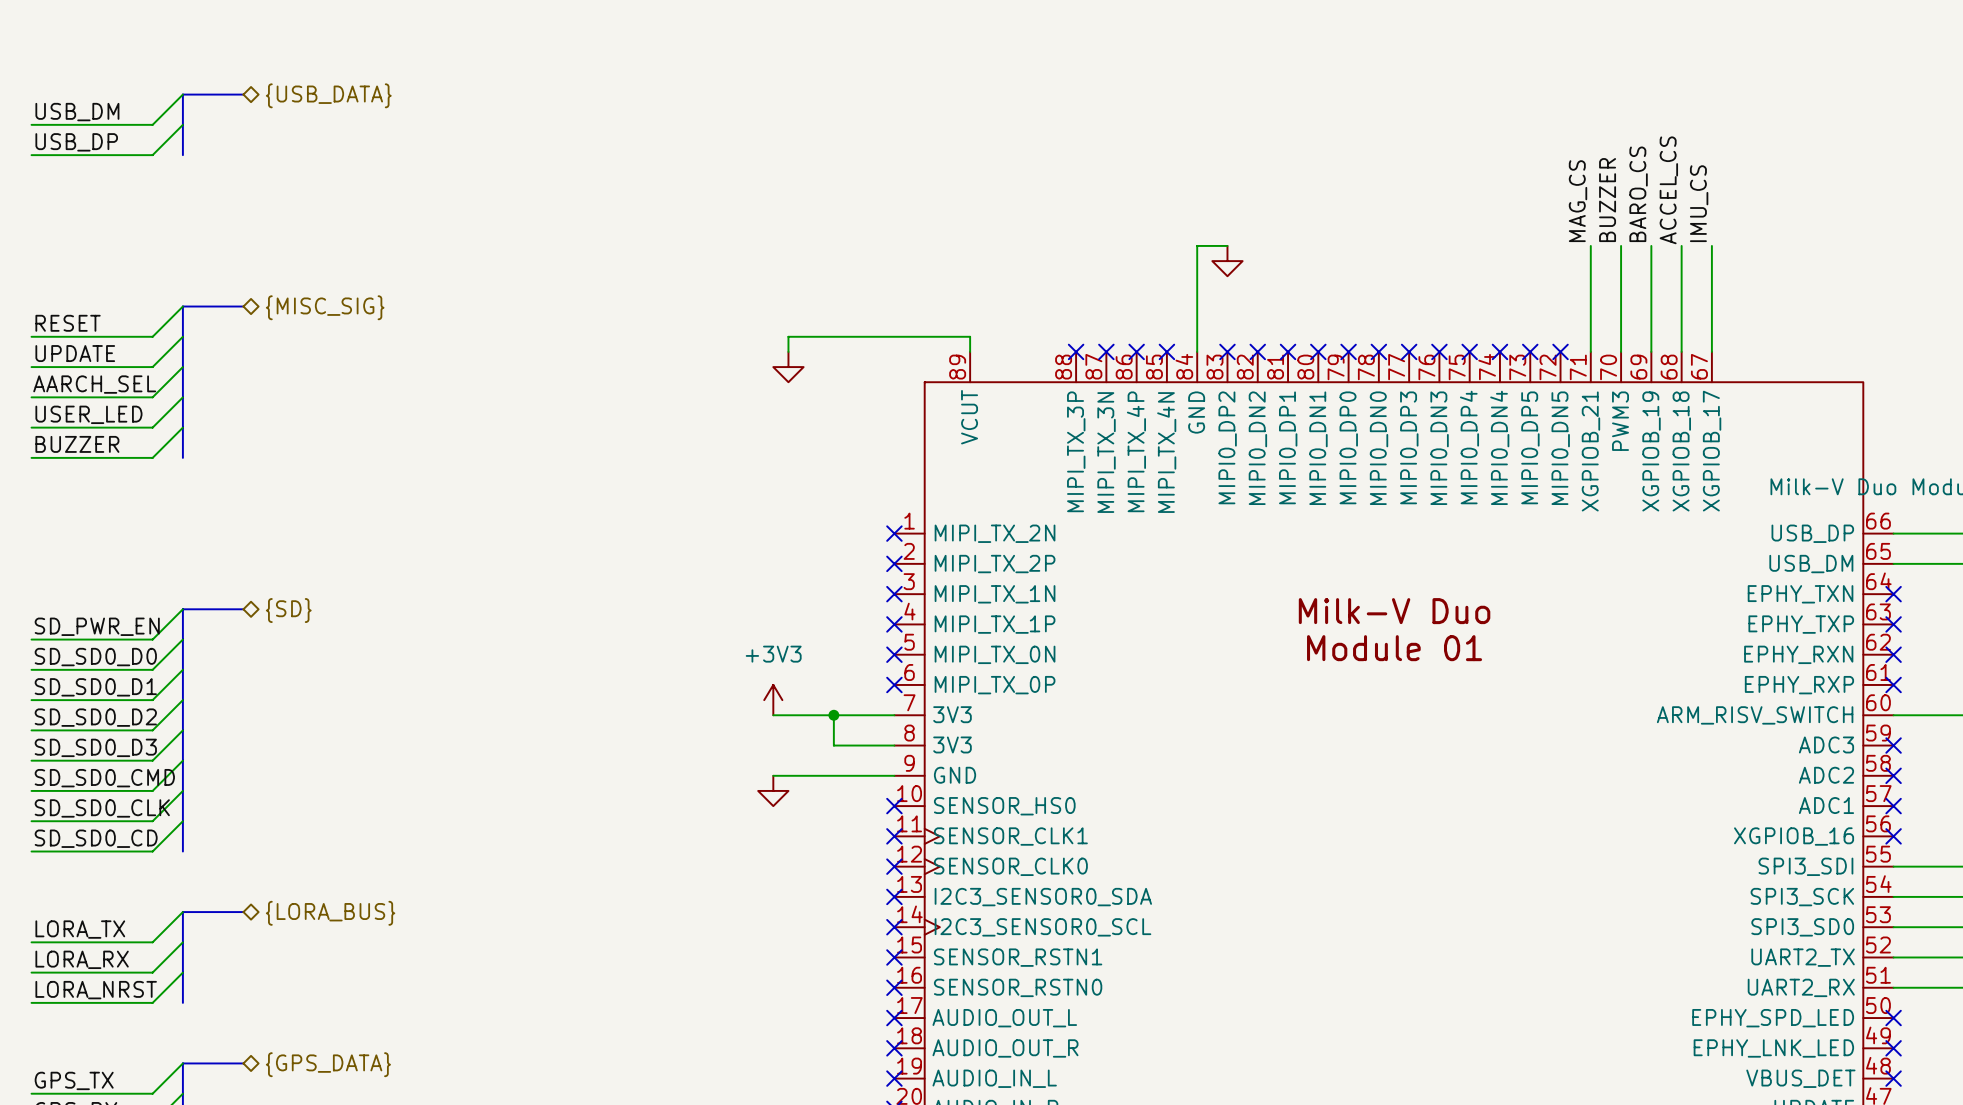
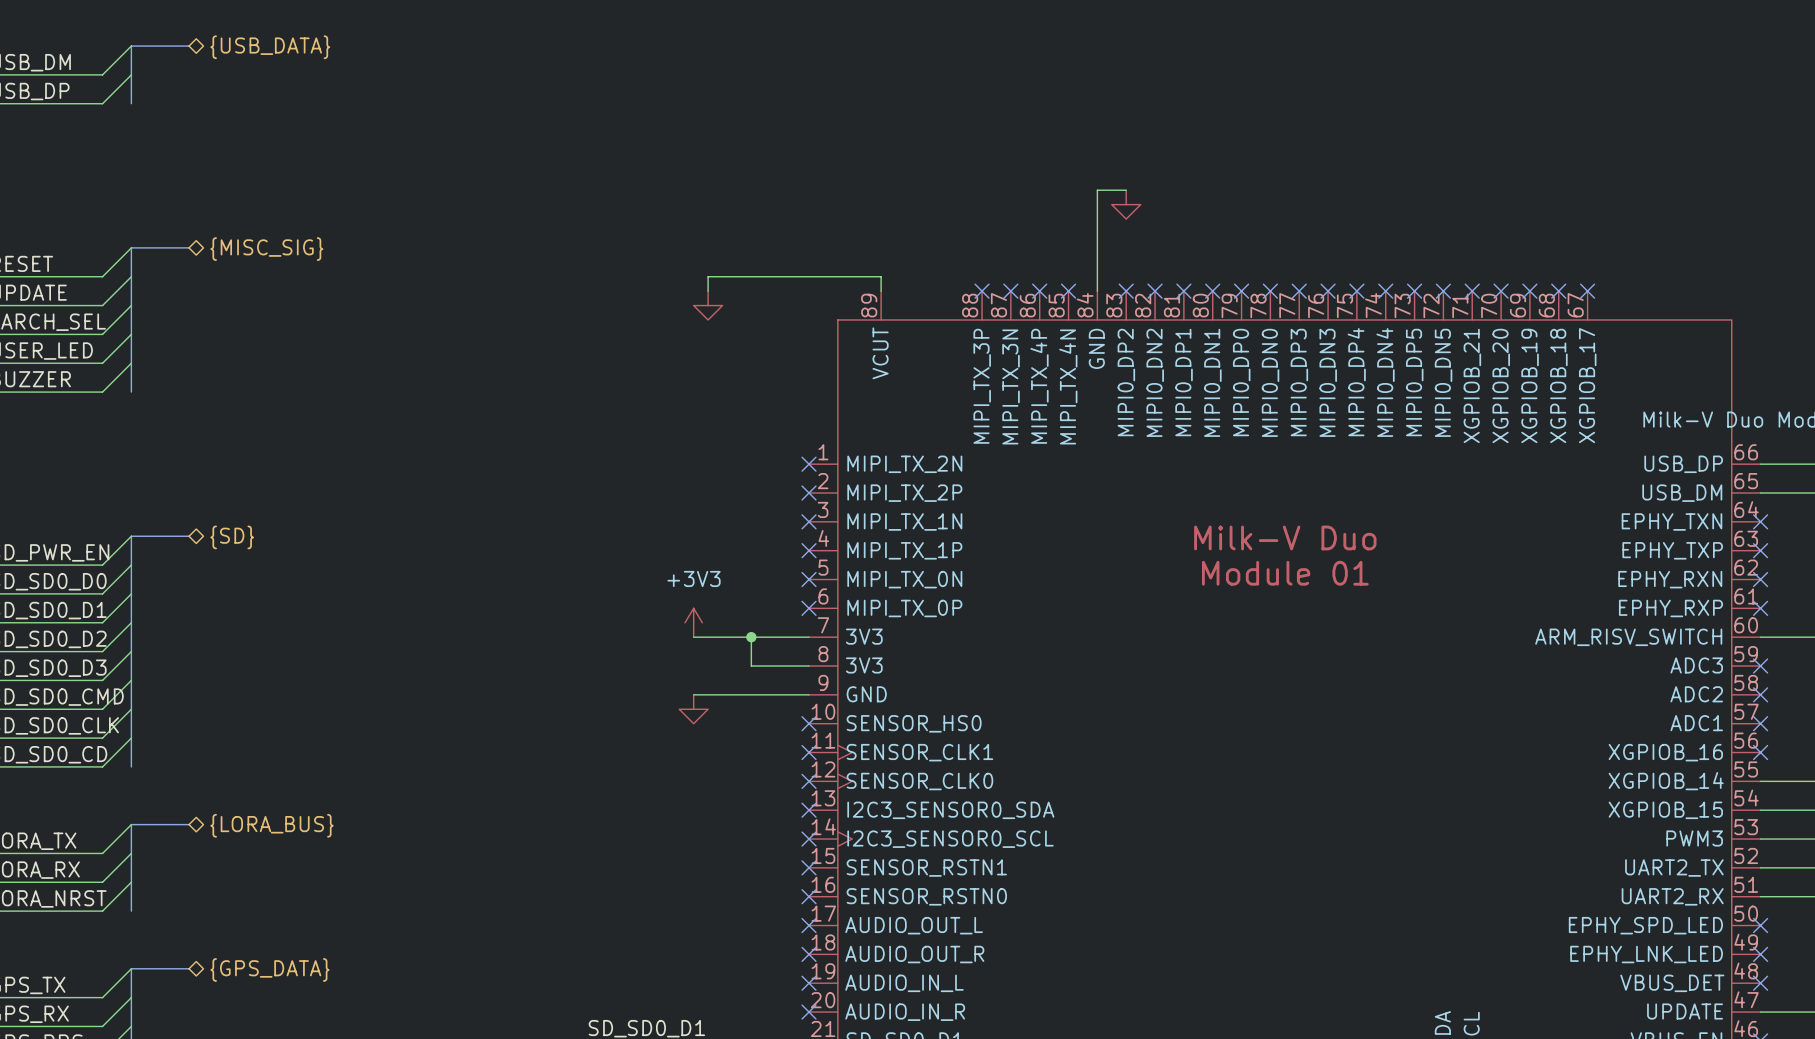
label: ACCEL_CS (1668, 190) -> none
label: BARO_CS (1638, 194) -> none
label: BUZZER (1607, 200) -> none
label: MAG_CS (1578, 201) -> none
label: IMU_CS (1699, 203) -> none
wire: (1590, 245) (1590, 351) -> none
wire: (1621, 245) (1621, 351) -> none
wire: (1651, 245) (1651, 351) -> none
wire: (1681, 245) (1681, 351) -> none
wire: (1711, 245) (1711, 351) -> none
no-connect mark: none -> (1472, 291)
no-connect mark: none -> (1501, 291)
no-connect mark: none -> (1529, 291)
no-connect mark: none -> (1558, 291)
no-connect mark: none -> (1587, 291)
part pin name: PWM3 (1620, 421) -> XGPIOB_20 (1501, 385)
part pin name: SPI3_SDI (1805, 866) -> XGPIOB_14 (1666, 781)
part pin name: SPI3_SCK (1802, 897) -> XGPIOB_15 (1665, 810)
part pin name: SPI3_SD0 (1802, 927) -> PWM3 (1694, 838)

